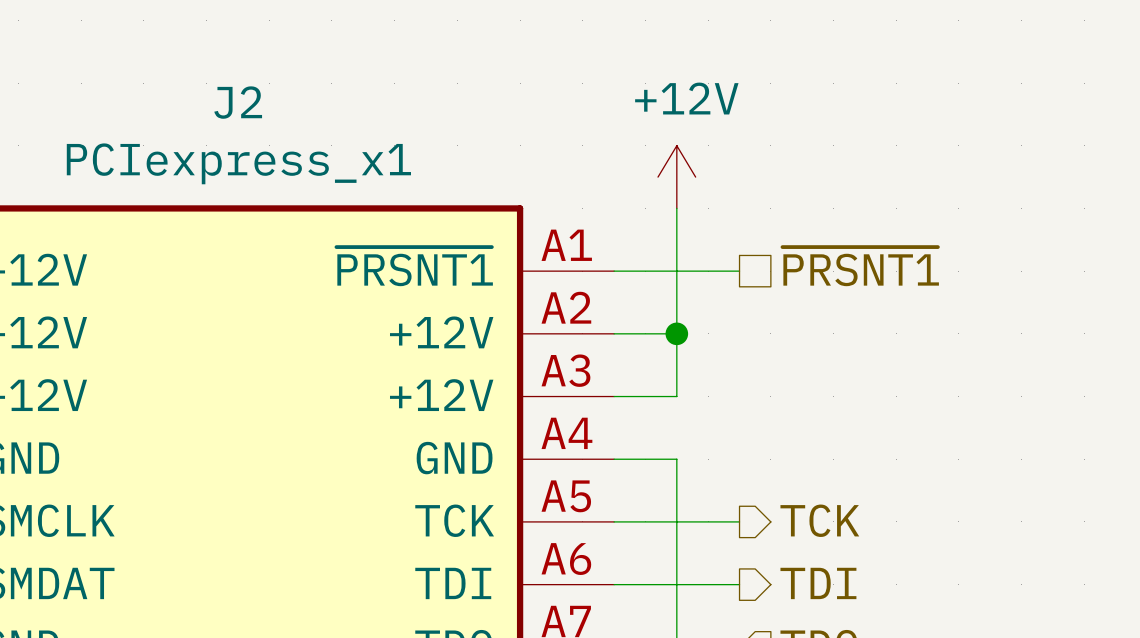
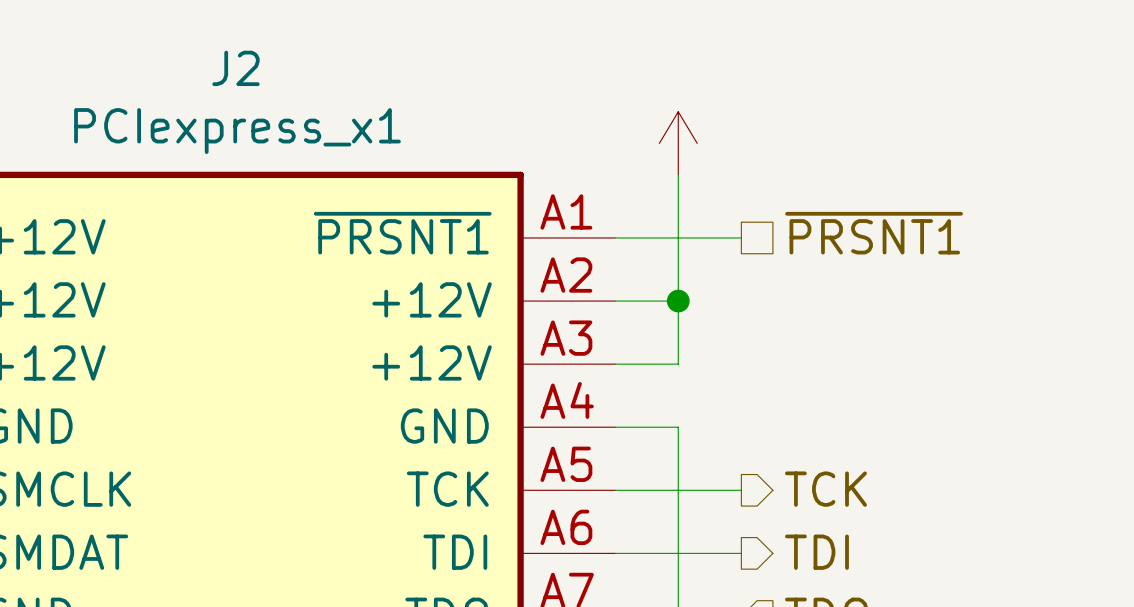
power symbol text: +12V (686, 98) -> none

